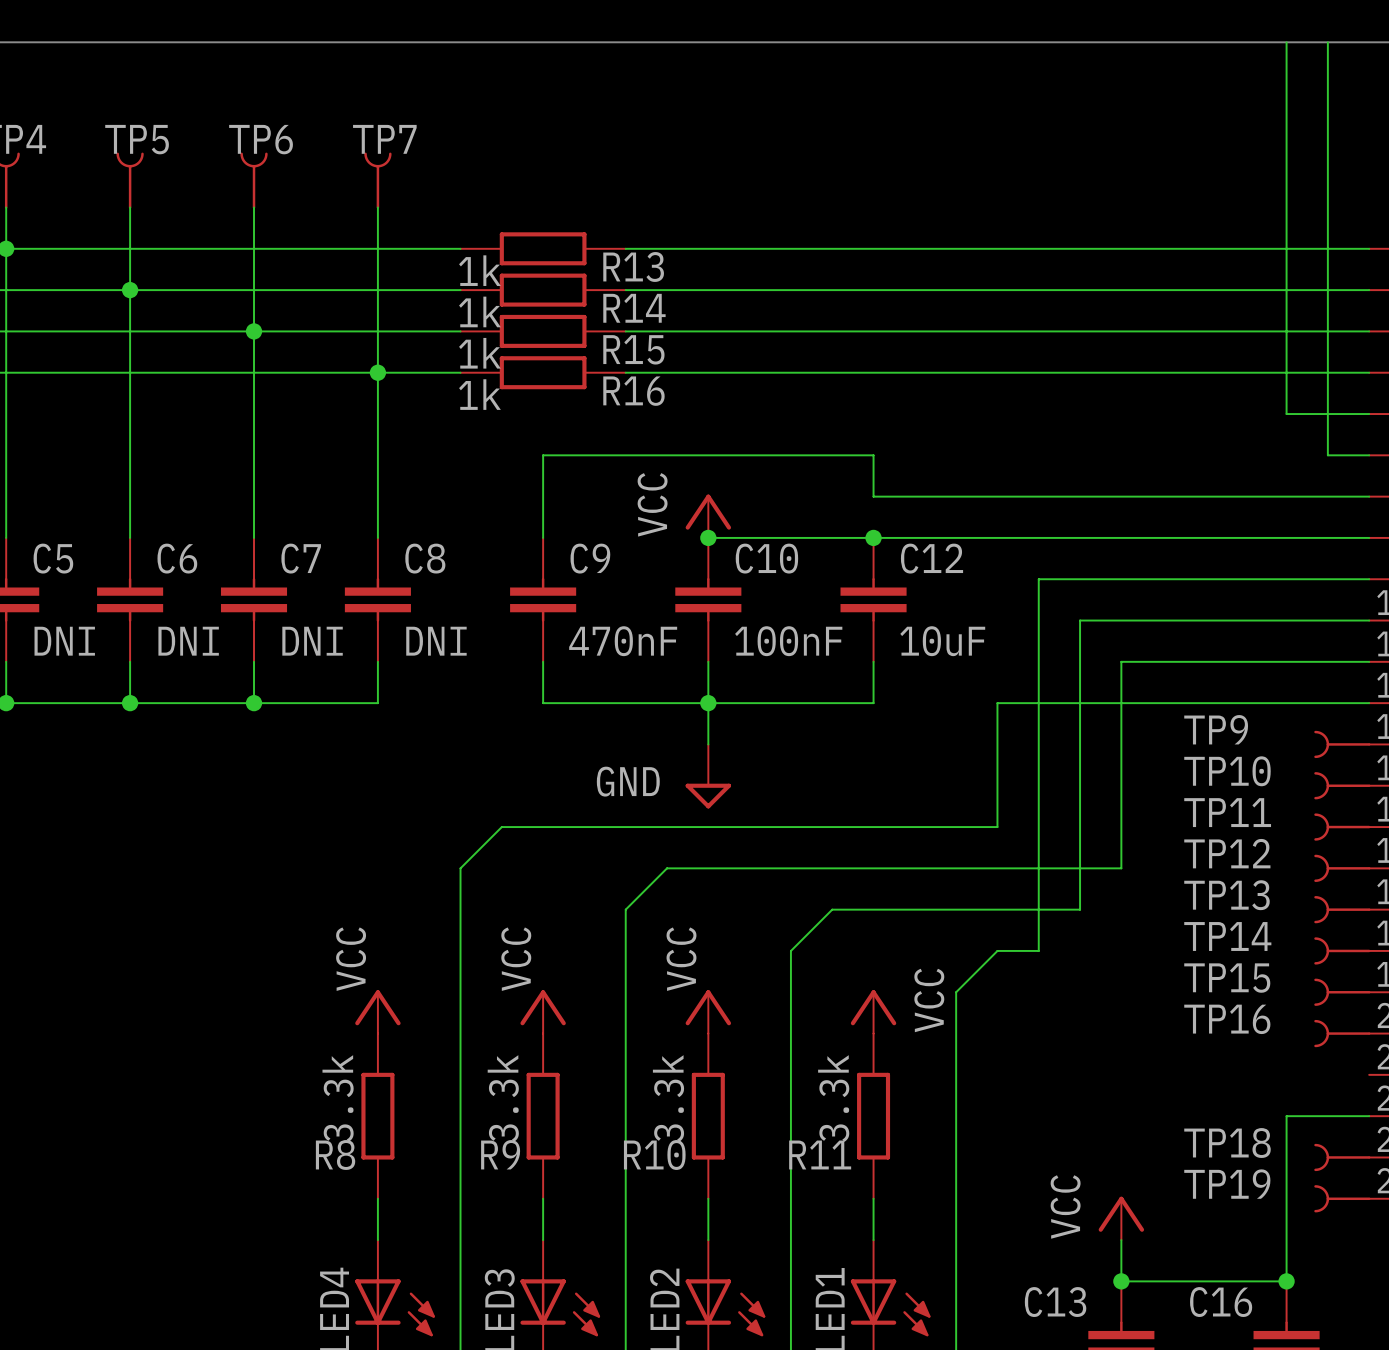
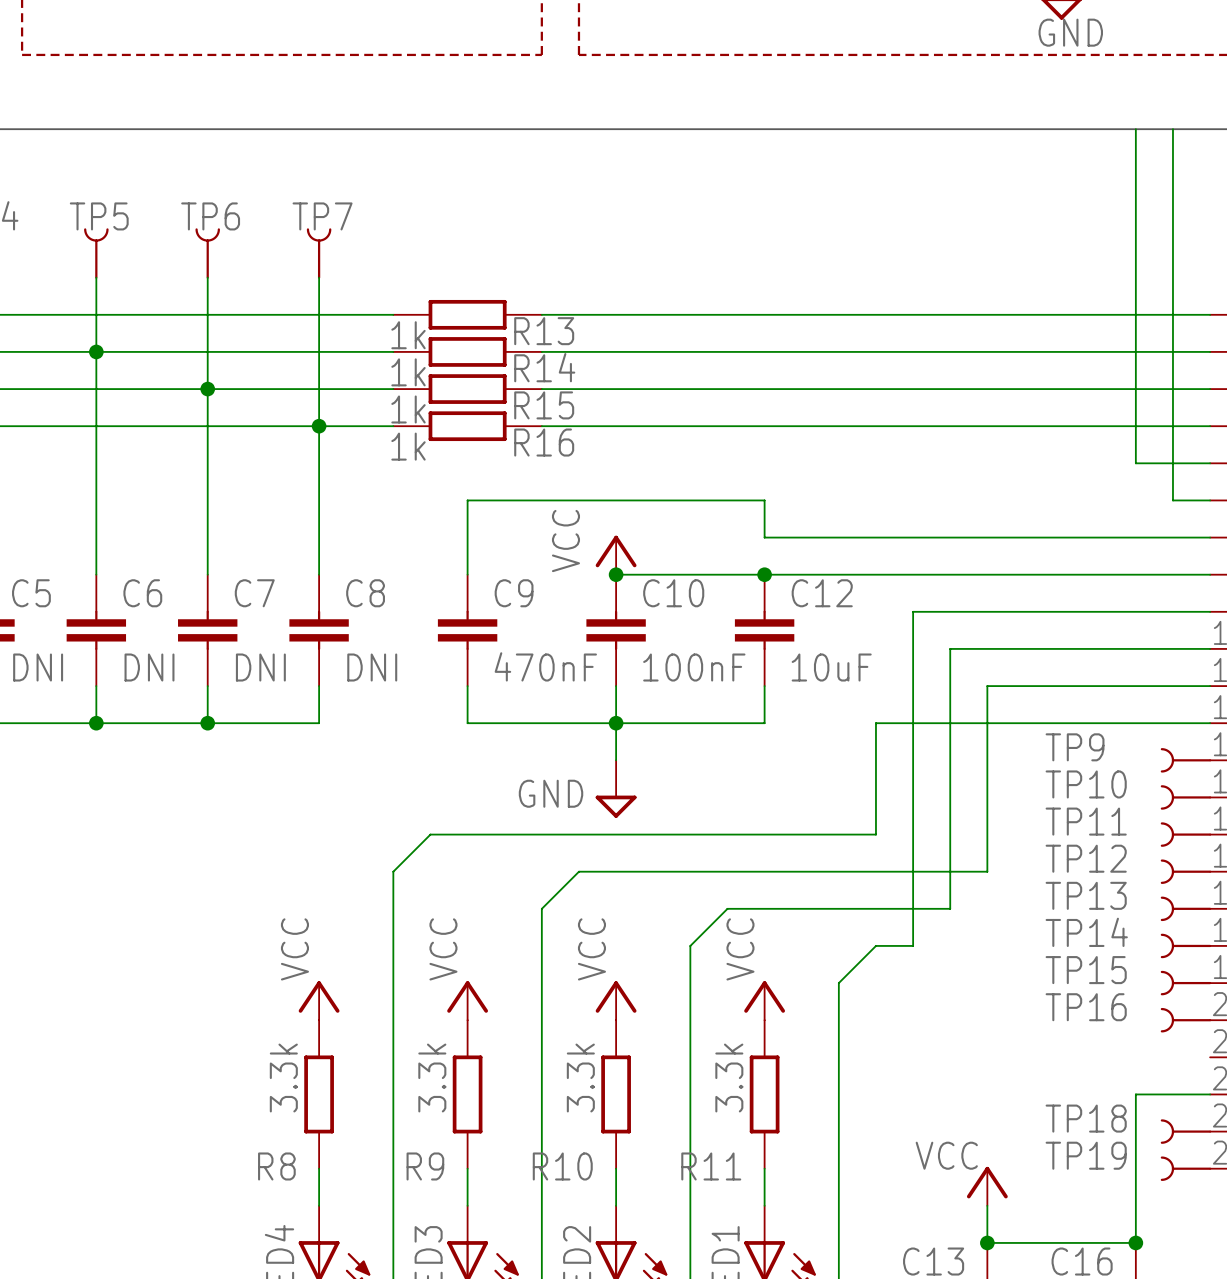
power symbol text position: VCC (929, 1000) -> VCC (740, 949)
R8 name position: R8 (335, 1154) -> R8 (276, 1166)
R9 name position: R9 (500, 1154) -> R9 (425, 1166)
R10 name position: R10 (654, 1154) -> R10 (562, 1166)
R11 name position: R11 (820, 1154) -> R11 (711, 1166)
power symbol text rotation: 0° (1065, 1207) -> 90° clockwise (946, 1155)

